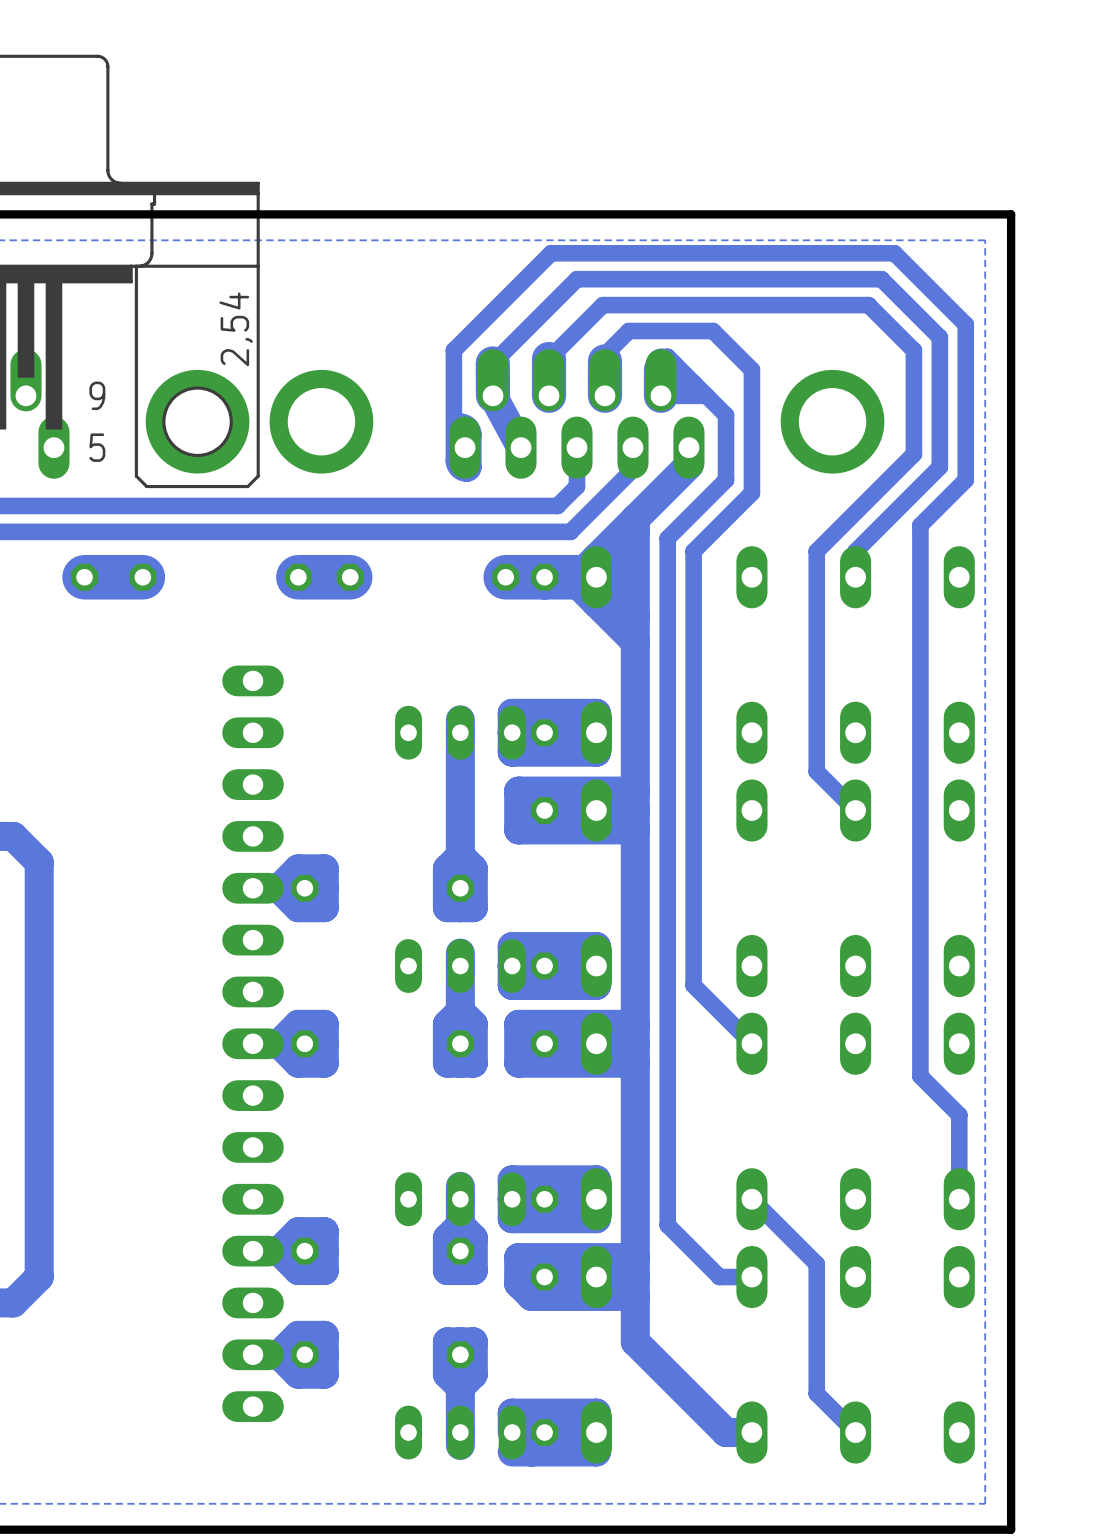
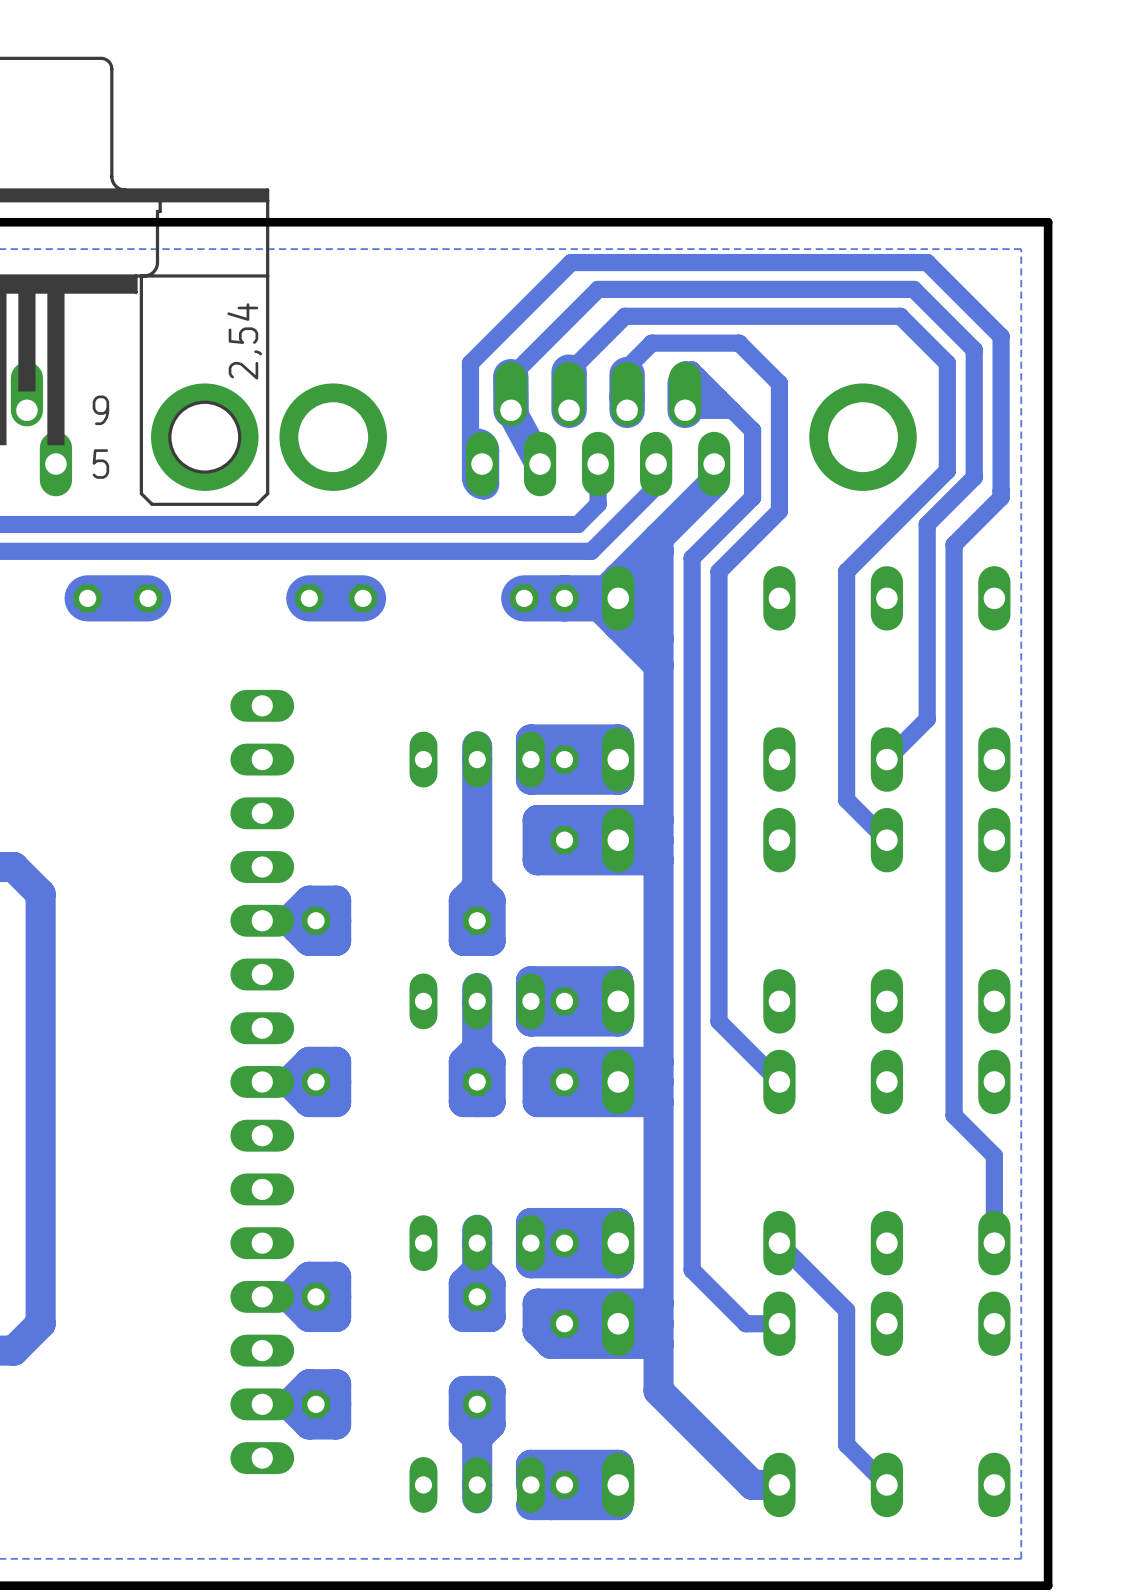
track: (939, 460) (939, 467) (855, 551) (855, 577) -> (974, 477) (927, 524) (927, 719) (886, 759)

